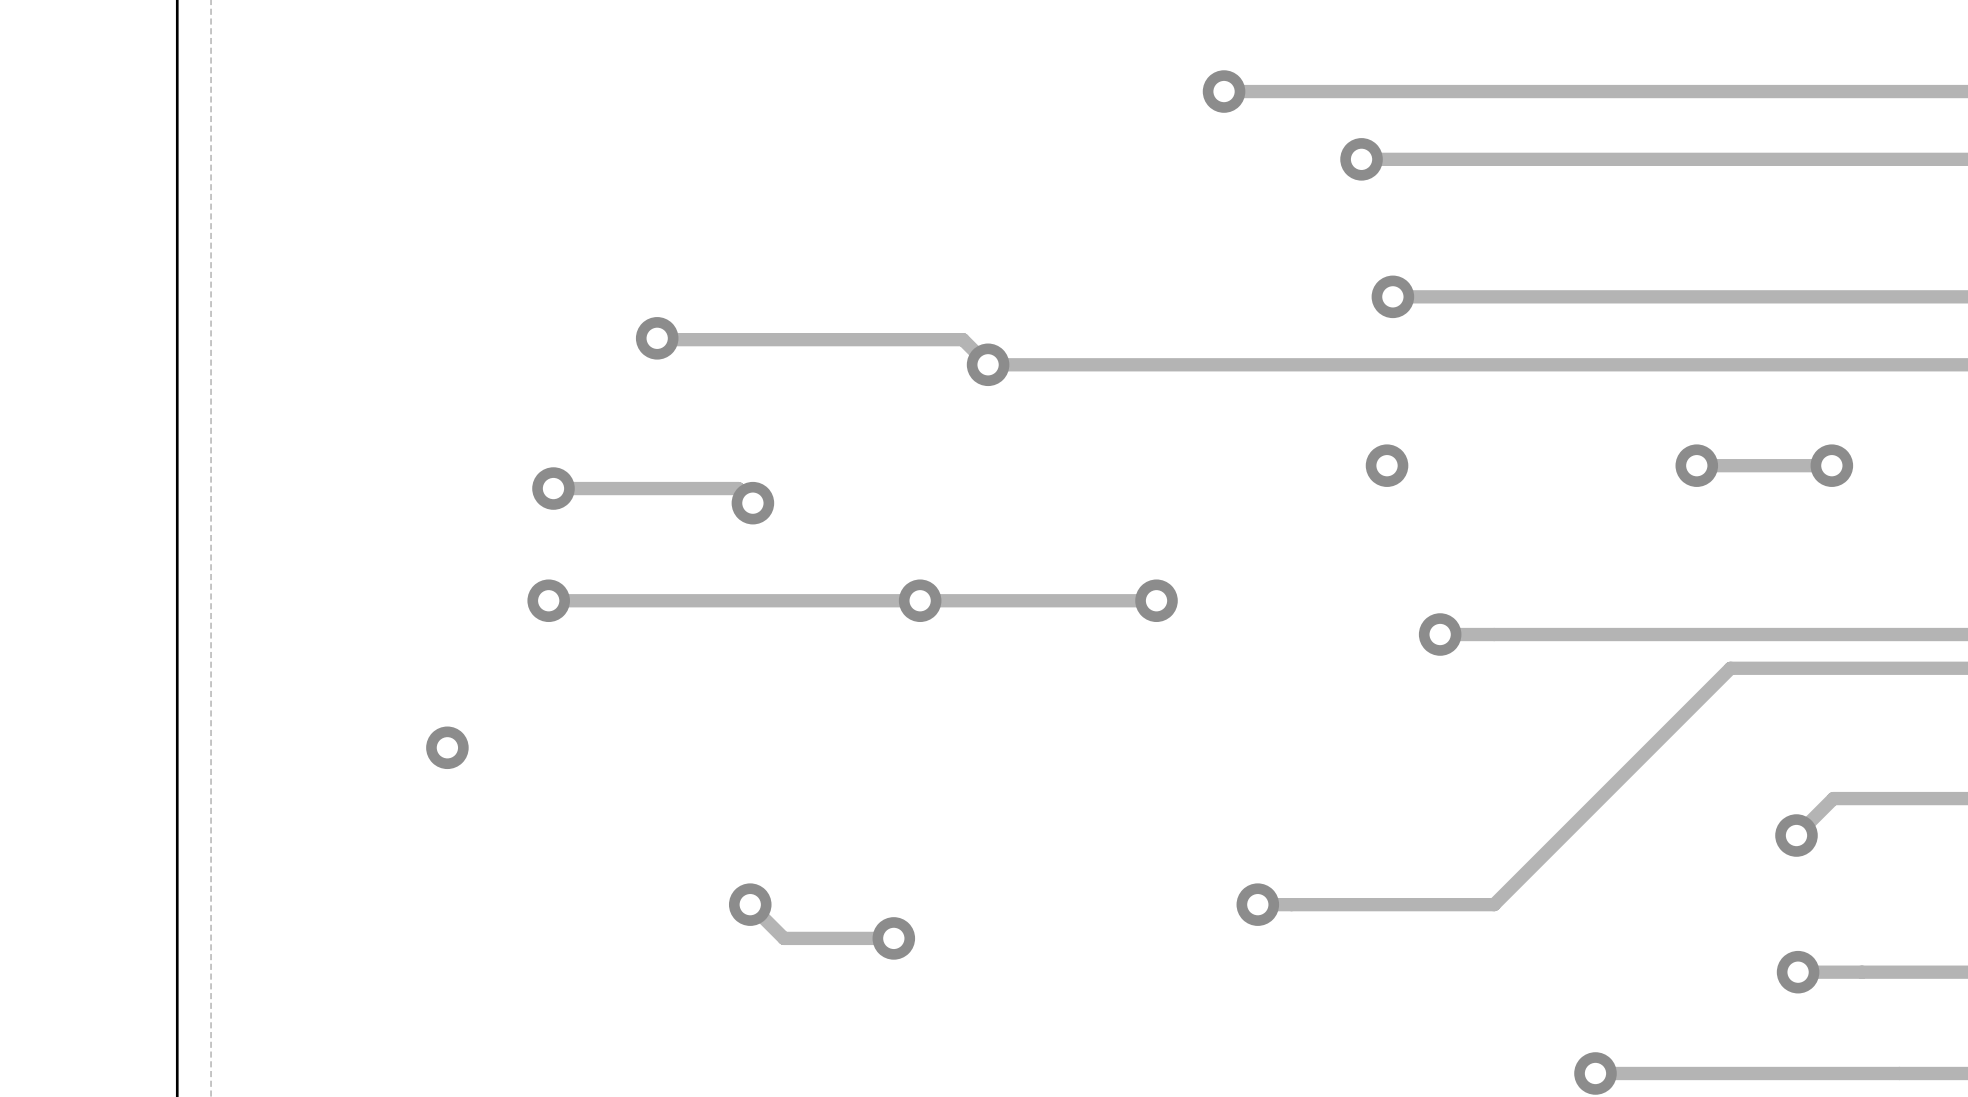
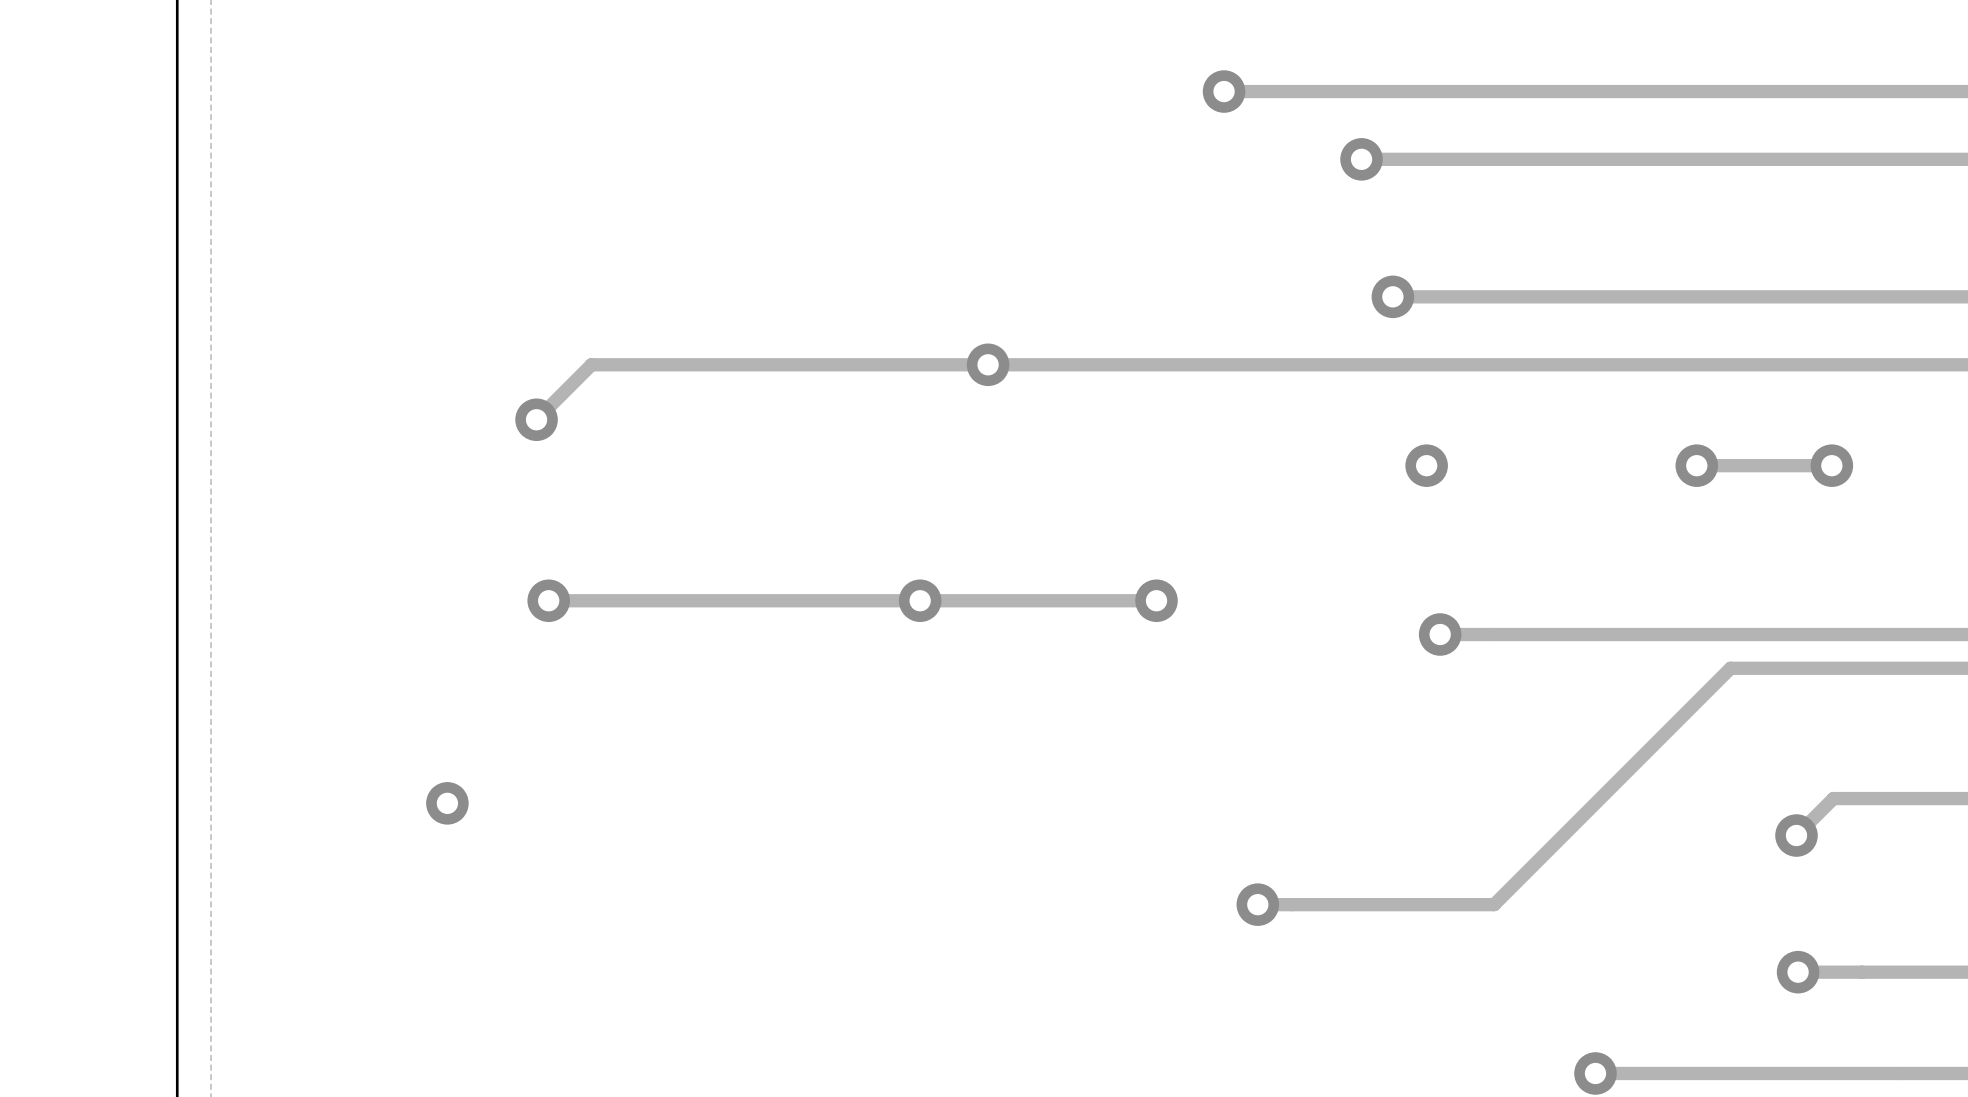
track: (657, 338) (962, 339) (988, 364) -> (536, 419) (591, 364) (988, 364)
via: (657, 338) -> none
via position: (1387, 465) -> (1426, 465)
track: (553, 488) (738, 488) (752, 503) -> none
via position: (553, 488) -> (536, 419)
via: (752, 503) -> none
via position: (447, 747) -> (447, 803)
track: (750, 904) (784, 938) (893, 938) -> none
via: (750, 904) -> none
via: (893, 938) -> none

